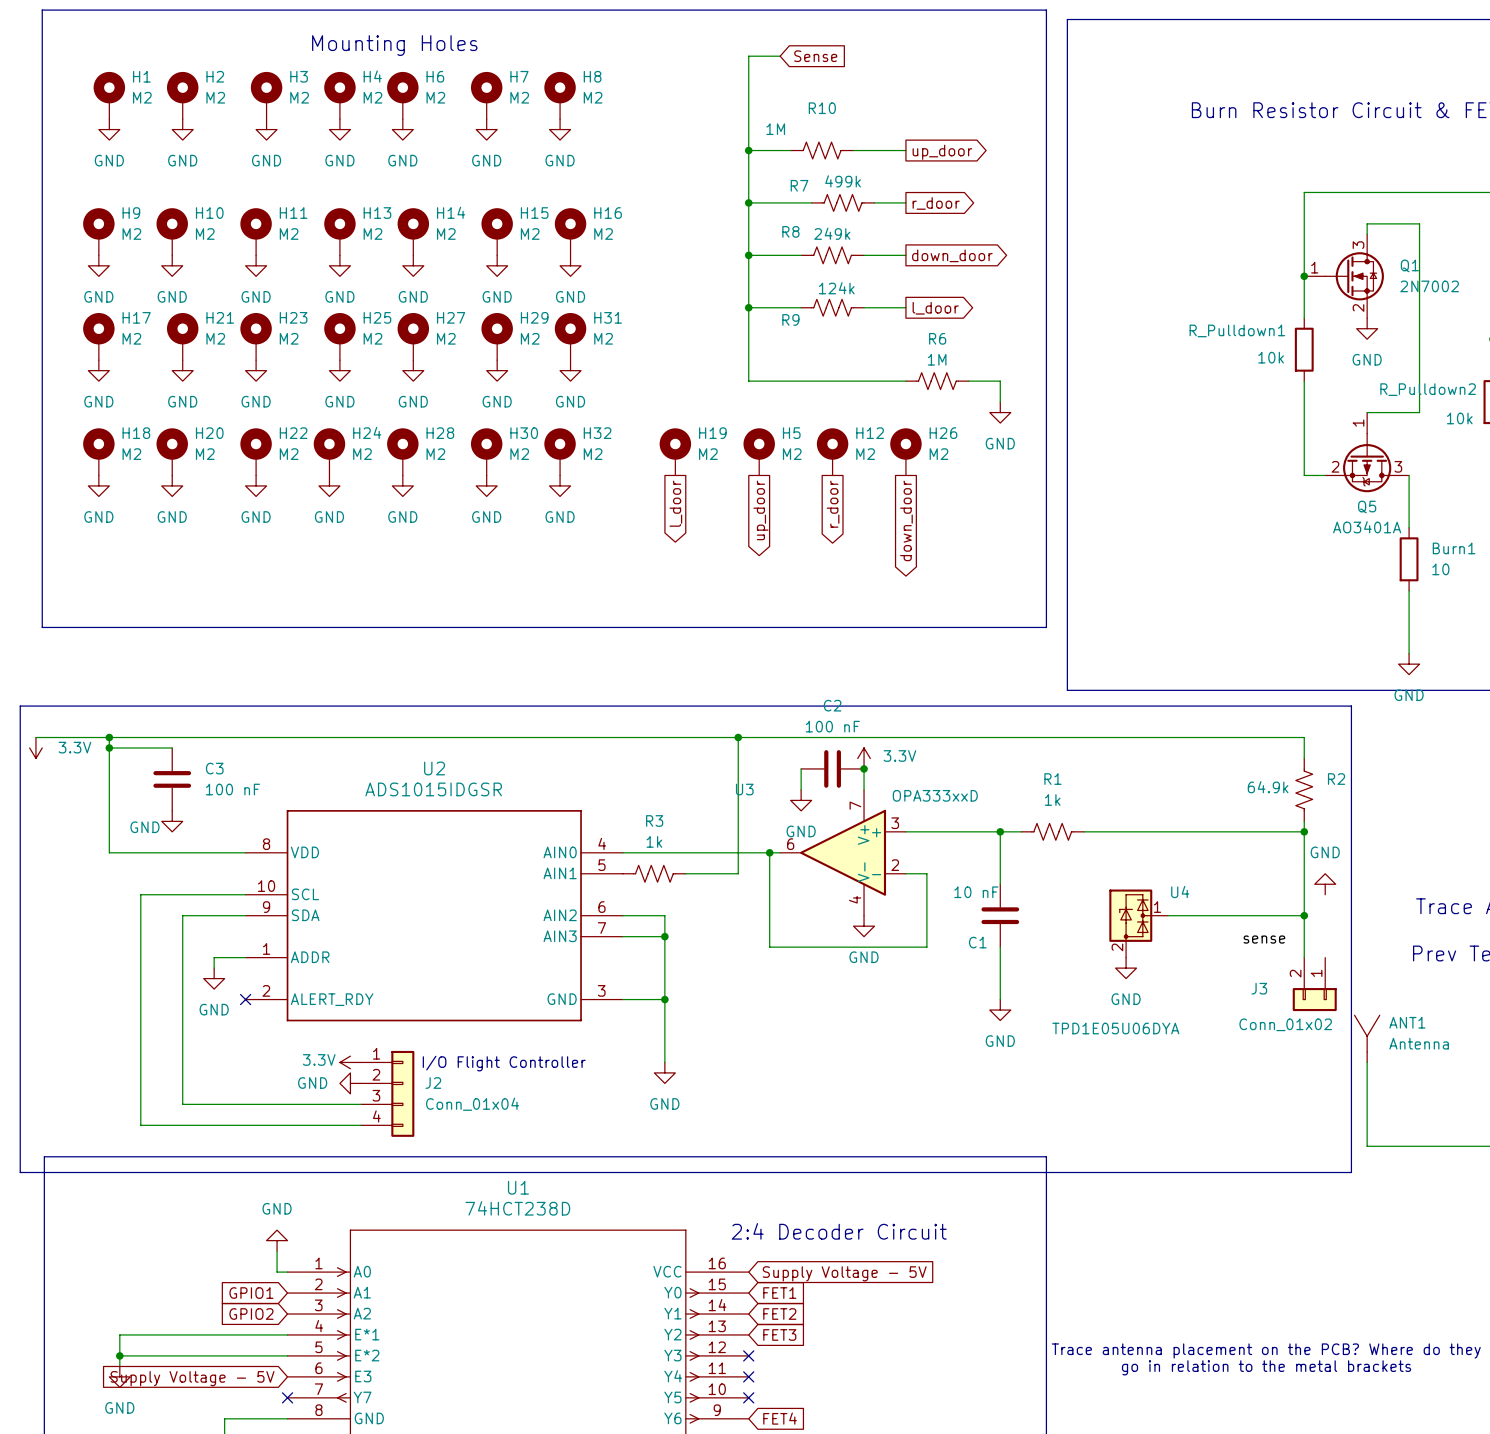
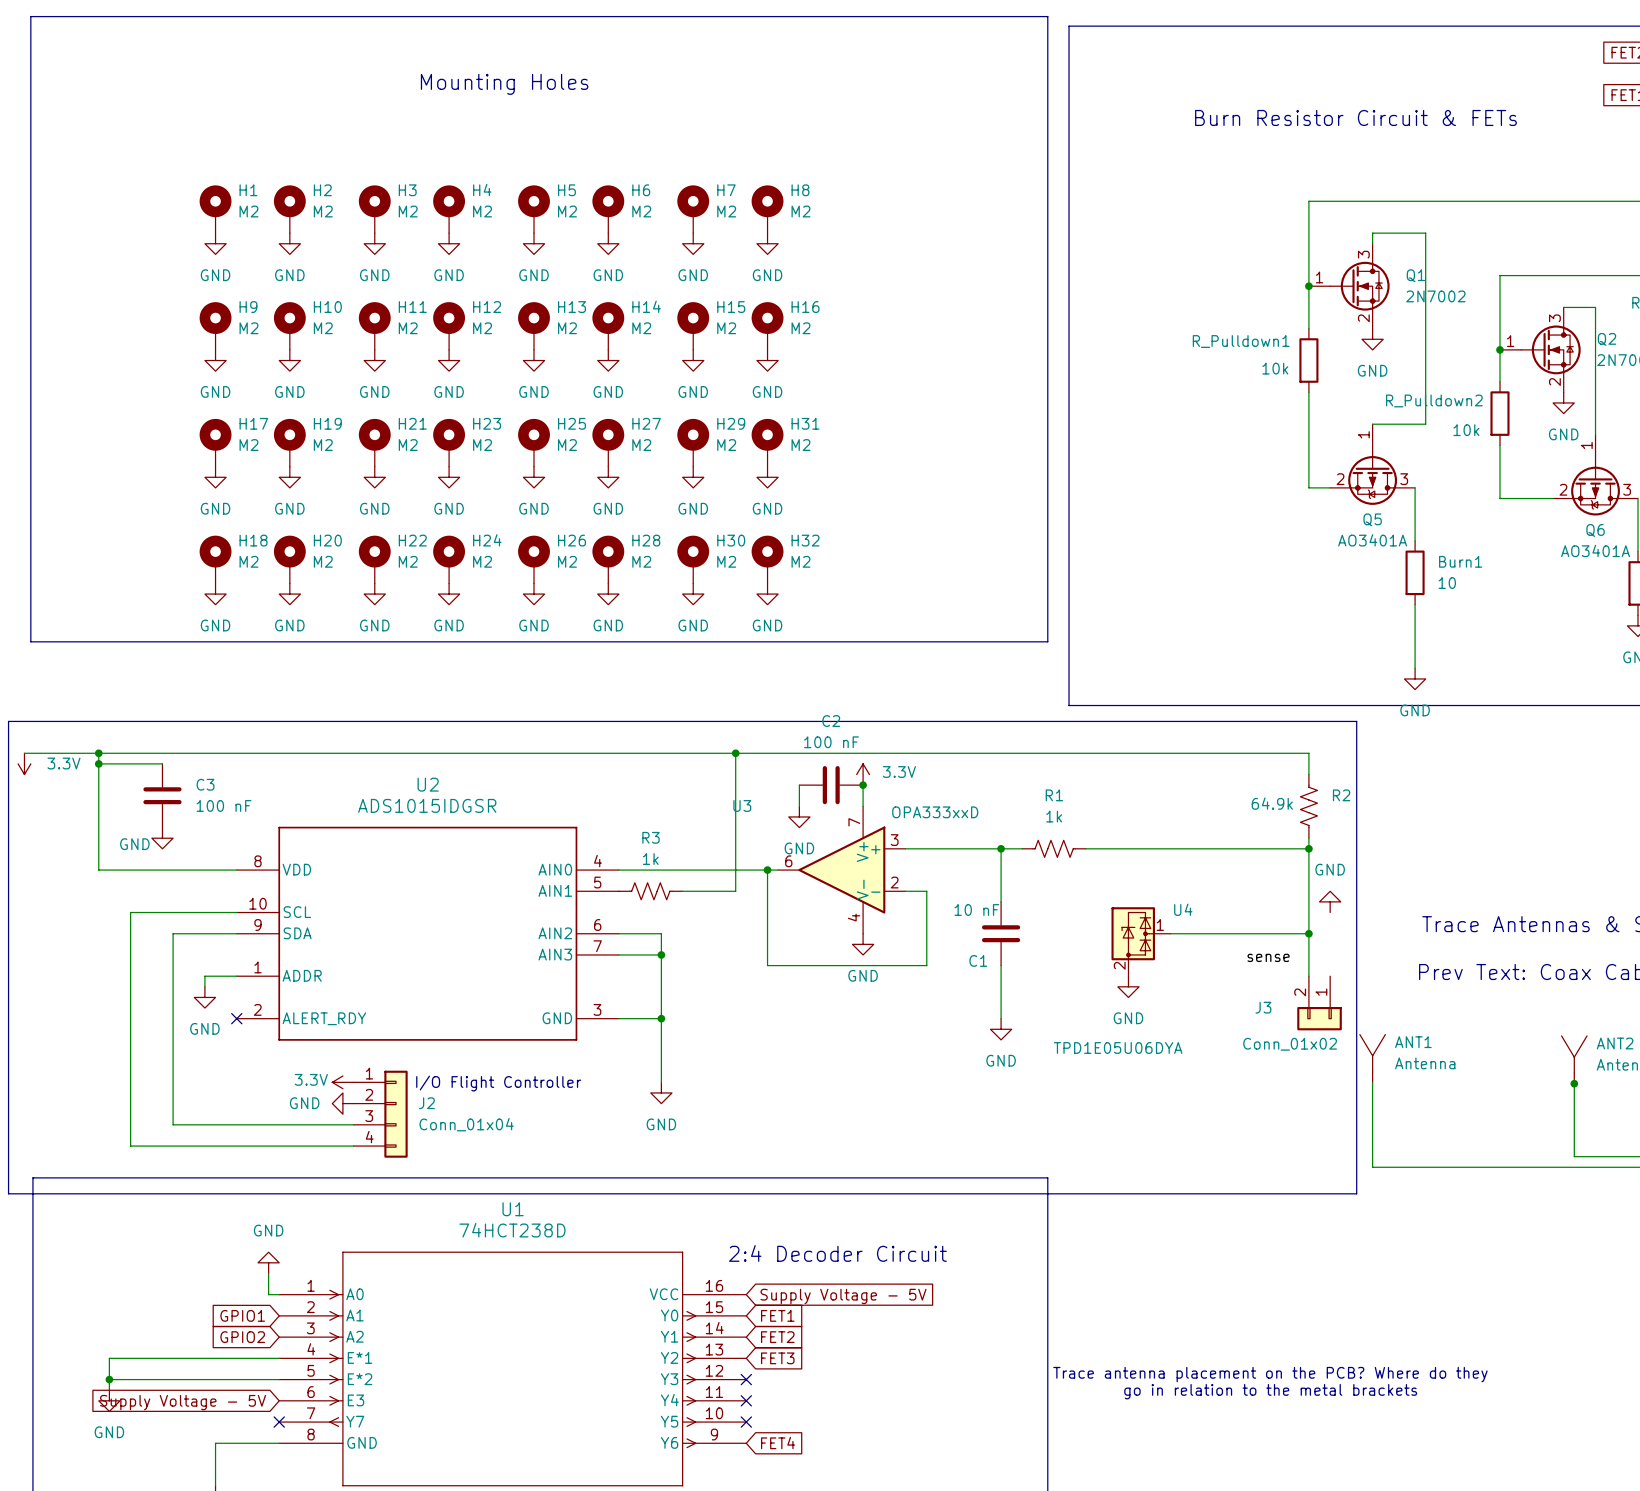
text position: Mounting Holes (394, 45) -> Mounting Holes (504, 84)
wire: (780, 56) (748, 56) (748, 381) (905, 381) -> none
global label: Sense (815, 56) -> none
H1 position: (109, 95) -> (215, 209)
H2 position: (182, 95) -> (289, 209)
H3 position: (266, 95) -> (374, 209)
H4 position: (339, 95) -> (449, 209)
H6 position: (402, 95) -> (608, 209)
H7 position: (486, 95) -> (693, 209)
H8 position: (560, 95) -> (767, 209)
power symbol: GND (109, 129) -> none
power symbol: GND (182, 129) -> none
power symbol: GND (266, 129) -> none
power symbol: GND (339, 129) -> none
power symbol: GND (402, 129) -> none
power symbol: GND (486, 129) -> none
power symbol: GND (560, 129) -> none
wire: (748, 150) (790, 150) -> none
junction: (748, 150) -> none
R10: 1M (822, 150) -> none
wire: (853, 150) (905, 150) -> none
global label: up_door (942, 152) -> none
wire: (748, 202) (811, 202) -> none
junction: (748, 202) -> none
R7: 499k (843, 202) -> none
wire: (874, 202) (905, 202) -> none
global label: r_door (936, 203) -> none
H9 position: (98, 231) -> (215, 326)
H10 position: (172, 231) -> (289, 326)
H11 position: (256, 231) -> (374, 326)
H13 position: (339, 231) -> (534, 326)
H14 position: (413, 231) -> (608, 326)
H15 position: (497, 231) -> (693, 326)
H16 position: (570, 231) -> (767, 326)
power symbol: none -> GND (215, 243)
power symbol: none -> GND (289, 243)
power symbol: none -> GND (374, 243)
power symbol: none -> GND (449, 243)
power symbol: none -> GND (534, 243)
power symbol: none -> GND (608, 243)
power symbol: none -> GND (693, 243)
power symbol: none -> GND (767, 243)
wire: (748, 255) (801, 255) -> none
junction: (748, 255) -> none
R8: 249k (832, 255) -> none
wire: (864, 255) (905, 255) -> none
global label: down_door (952, 255) -> none
power symbol: GND (98, 265) -> none
power symbol: GND (172, 265) -> none
power symbol: GND (256, 265) -> none
power symbol: GND (339, 265) -> none
power symbol: GND (413, 265) -> none
power symbol: GND (497, 265) -> none
power symbol: GND (570, 265) -> none
wire: (748, 307) (801, 307) -> none
junction: (748, 307) -> none
R9: 124k (832, 307) -> none
wire: (864, 307) (905, 307) -> none
global label: l_door (935, 308) -> none
H17 position: (98, 336) -> (215, 442)
H21 position: (182, 336) -> (374, 442)
H23 position: (256, 336) -> (449, 442)
H25 position: (339, 336) -> (534, 442)
H27 position: (413, 336) -> (608, 442)
H29 position: (497, 336) -> (693, 442)
H31 position: (570, 336) -> (767, 442)
power symbol: none -> GND (215, 360)
power symbol: none -> GND (289, 360)
power symbol: none -> GND (374, 360)
power symbol: none -> GND (449, 360)
power symbol: none -> GND (534, 360)
power symbol: none -> GND (608, 360)
power symbol: none -> GND (693, 360)
power symbol: none -> GND (767, 360)
power symbol: GND (98, 370) -> none
power symbol: GND (182, 370) -> none
power symbol: GND (256, 370) -> none
power symbol: GND (339, 370) -> none
power symbol: GND (413, 370) -> none
power symbol: GND (497, 370) -> none
power symbol: GND (570, 370) -> none
R6: 1M (937, 381) -> none
wire: (968, 381) (1000, 381) (1000, 402) -> none
power symbol: GND (1000, 412) -> none
H18 position: (98, 451) -> (215, 559)
H20 position: (172, 451) -> (289, 559)
H22 position: (256, 451) -> (374, 559)
H24 position: (329, 451) -> (449, 559)
H28 position: (402, 451) -> (608, 559)
H30 position: (486, 451) -> (693, 559)
H32 position: (560, 451) -> (767, 559)
H19 position: (675, 451) -> (289, 442)
H5 position: (759, 451) -> (534, 209)
H12 position: (832, 451) -> (449, 326)
H26 position: (905, 451) -> (534, 559)
power symbol: none -> GND (215, 477)
power symbol: none -> GND (289, 477)
power symbol: none -> GND (374, 477)
power symbol: none -> GND (449, 477)
power symbol: none -> GND (534, 477)
power symbol: none -> GND (608, 477)
power symbol: none -> GND (693, 477)
power symbol: none -> GND (767, 477)
power symbol: GND (98, 485) -> none
power symbol: GND (172, 485) -> none
power symbol: GND (256, 485) -> none
power symbol: GND (329, 485) -> none
power symbol: GND (402, 485) -> none
power symbol: GND (486, 485) -> none
power symbol: GND (560, 485) -> none
global label: l_door (675, 503) -> none
global label: r_door (833, 504) -> none
global label: up_door (760, 510) -> none
global label: down_door (906, 520) -> none
power symbol: none -> GND (215, 594)
power symbol: none -> GND (289, 594)
power symbol: none -> GND (374, 594)
power symbol: none -> GND (449, 594)
power symbol: none -> GND (534, 594)
power symbol: none -> GND (608, 594)
power symbol: none -> GND (693, 594)
power symbol: none -> GND (767, 594)

